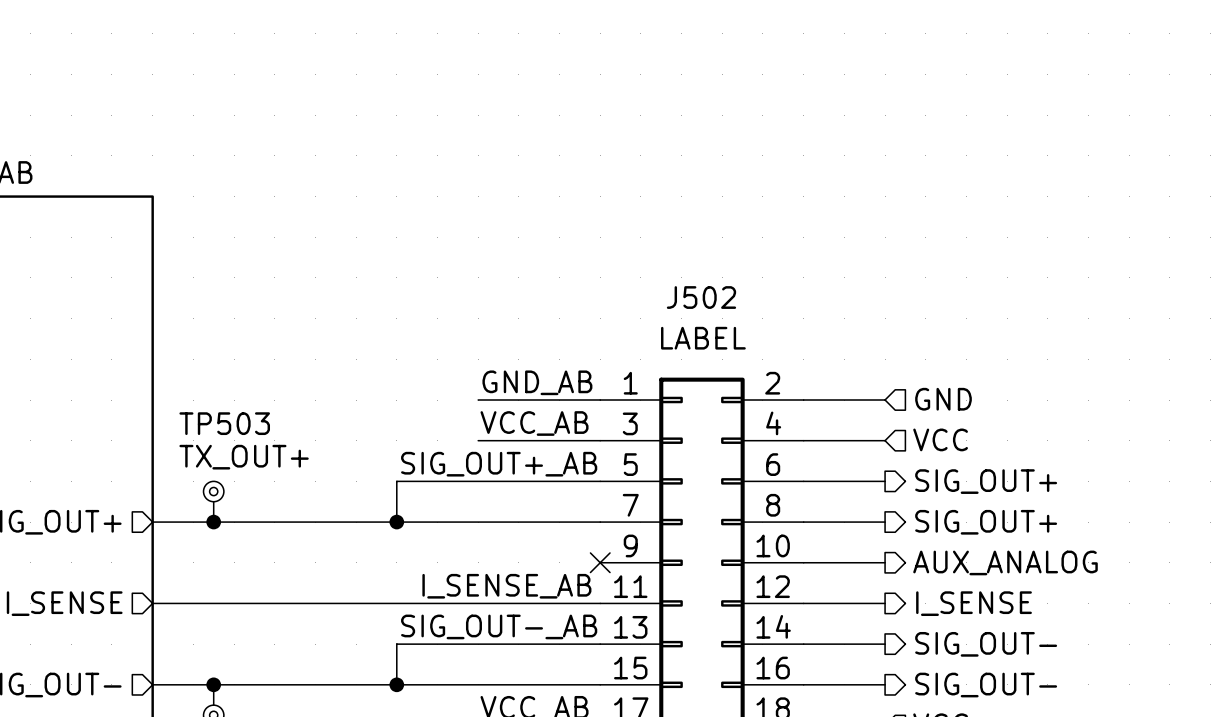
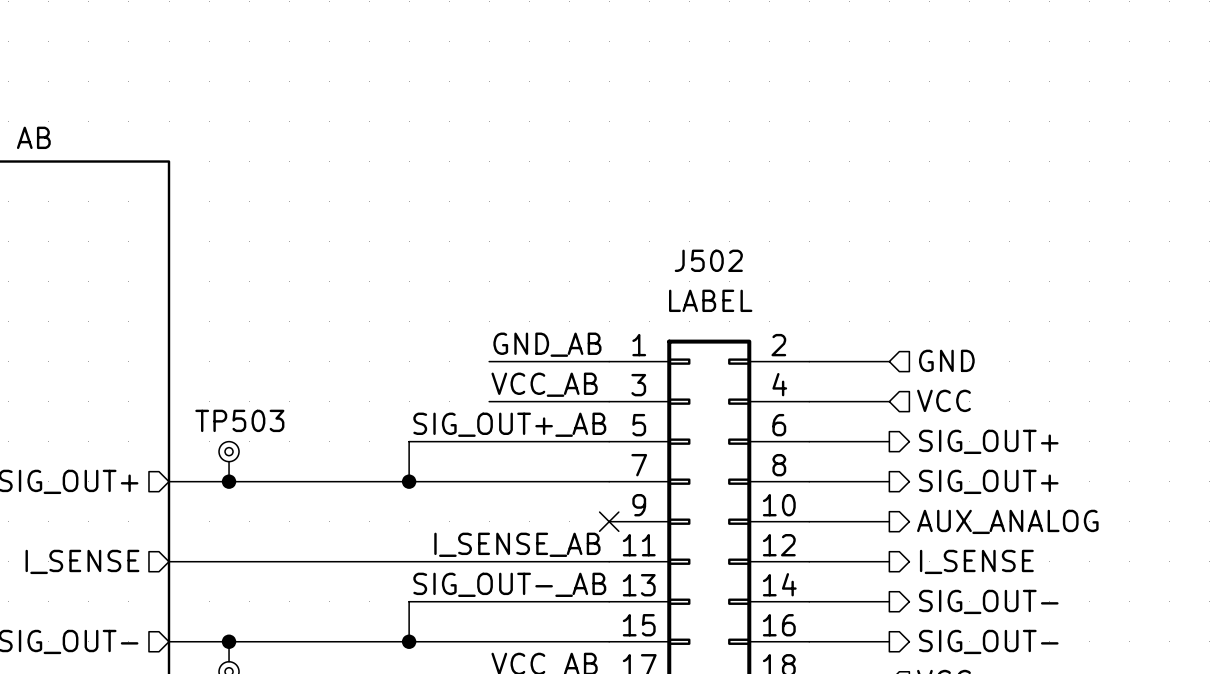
TP503 name position: TP503 (224, 423) -> TP503 (239, 420)
TP503 value: TX_OUT+ (244, 457) -> none

